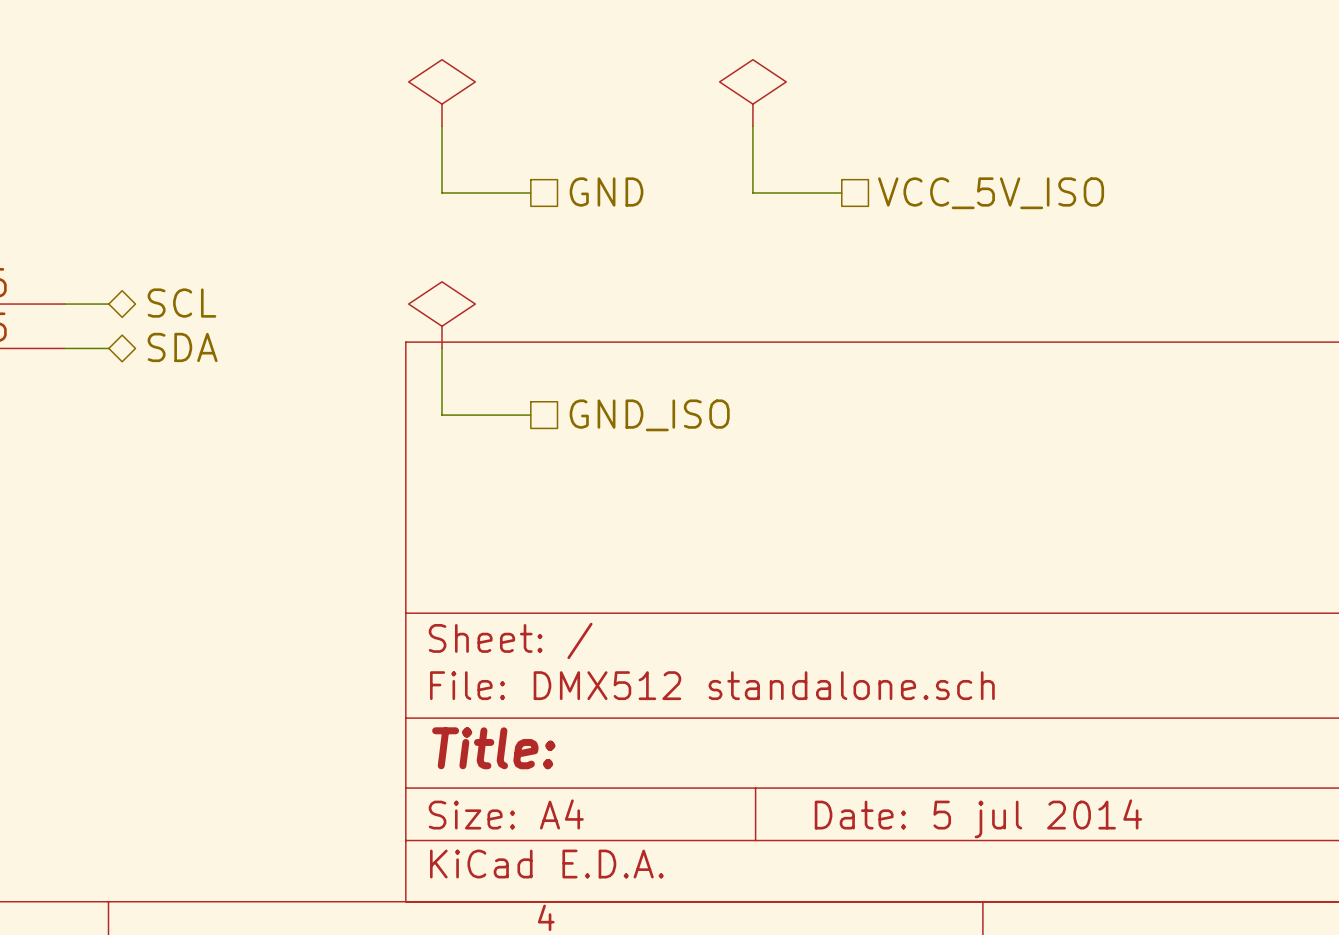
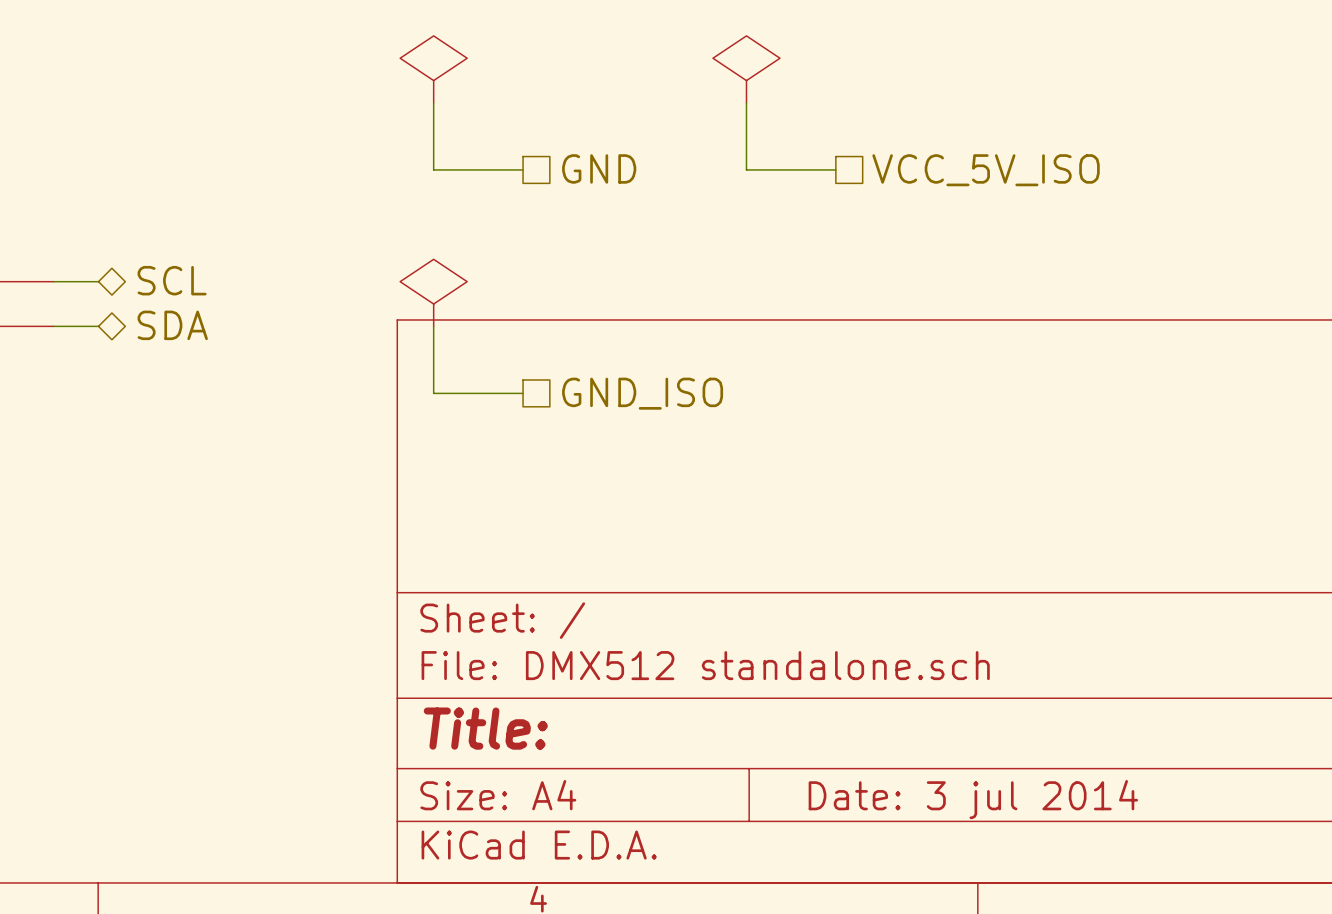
title block: Date: 5 jul 2014 (978, 818) -> Date: 3 jul 2014 (973, 799)

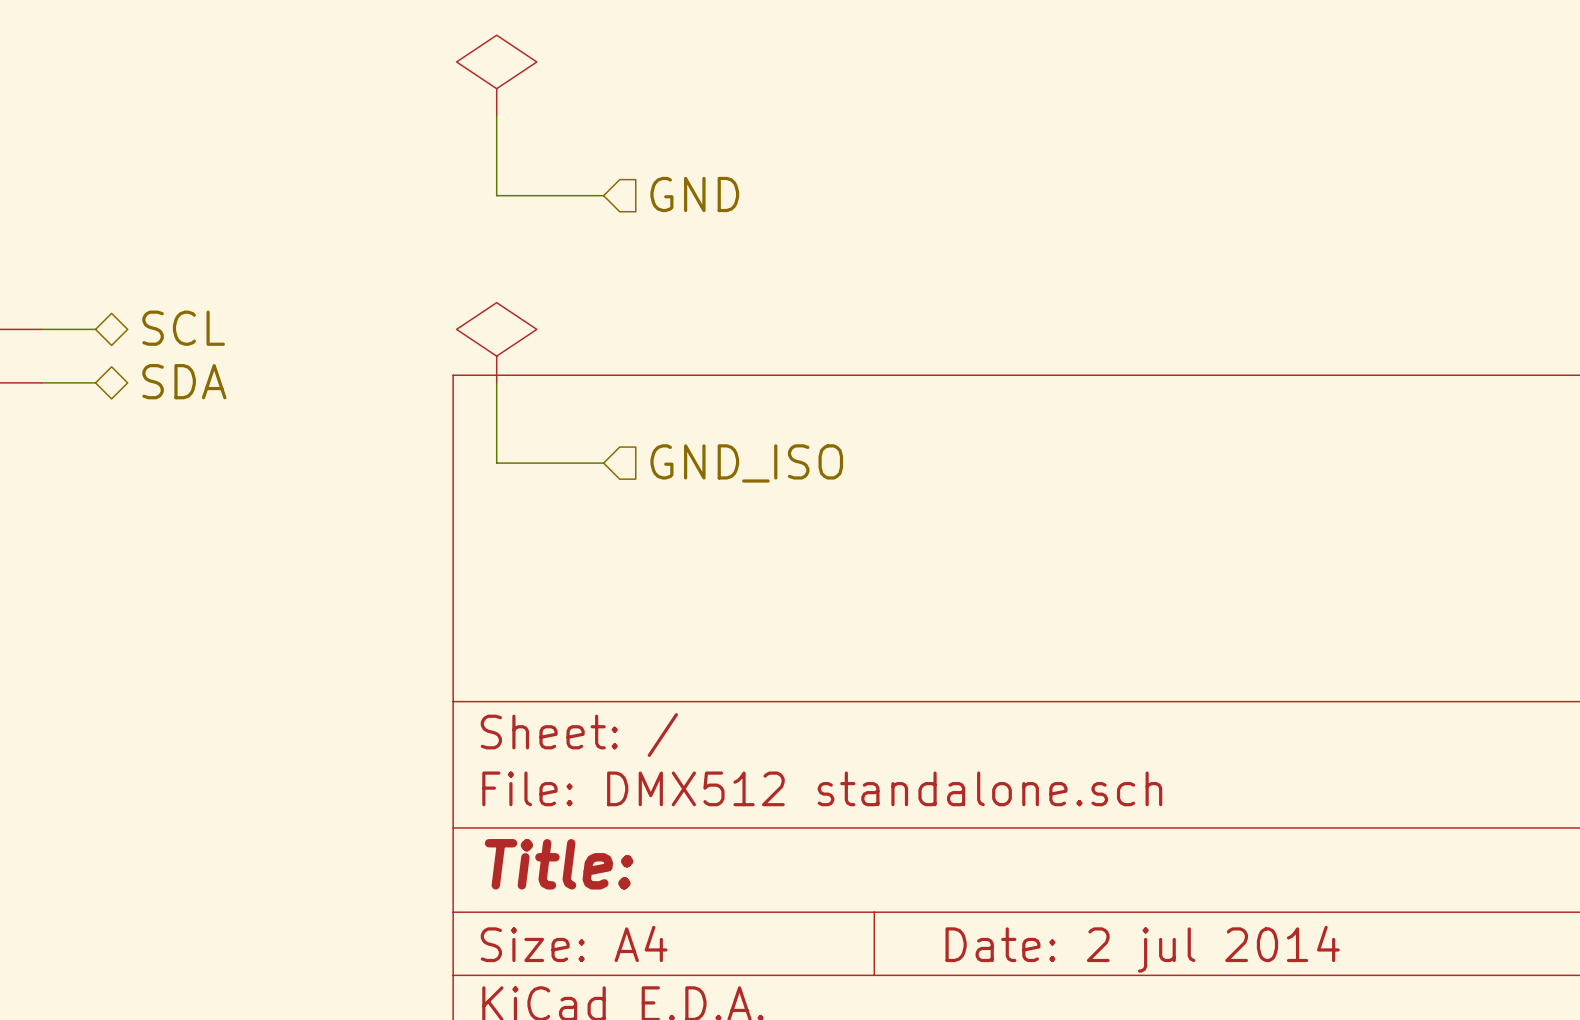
power symbol: (746, 69) -> none
wire: (746, 102) (746, 169) (835, 169) -> none
hierarchical label shape: passive (599, 168) -> input (694, 194)
hierarchical label: VCC_5V_ISO (986, 170) -> none
hierarchical label shape: passive (642, 393) -> input (746, 463)
title block: Date: 3 jul 2014 (973, 799) -> Date: 2 jul 2014 (1142, 949)

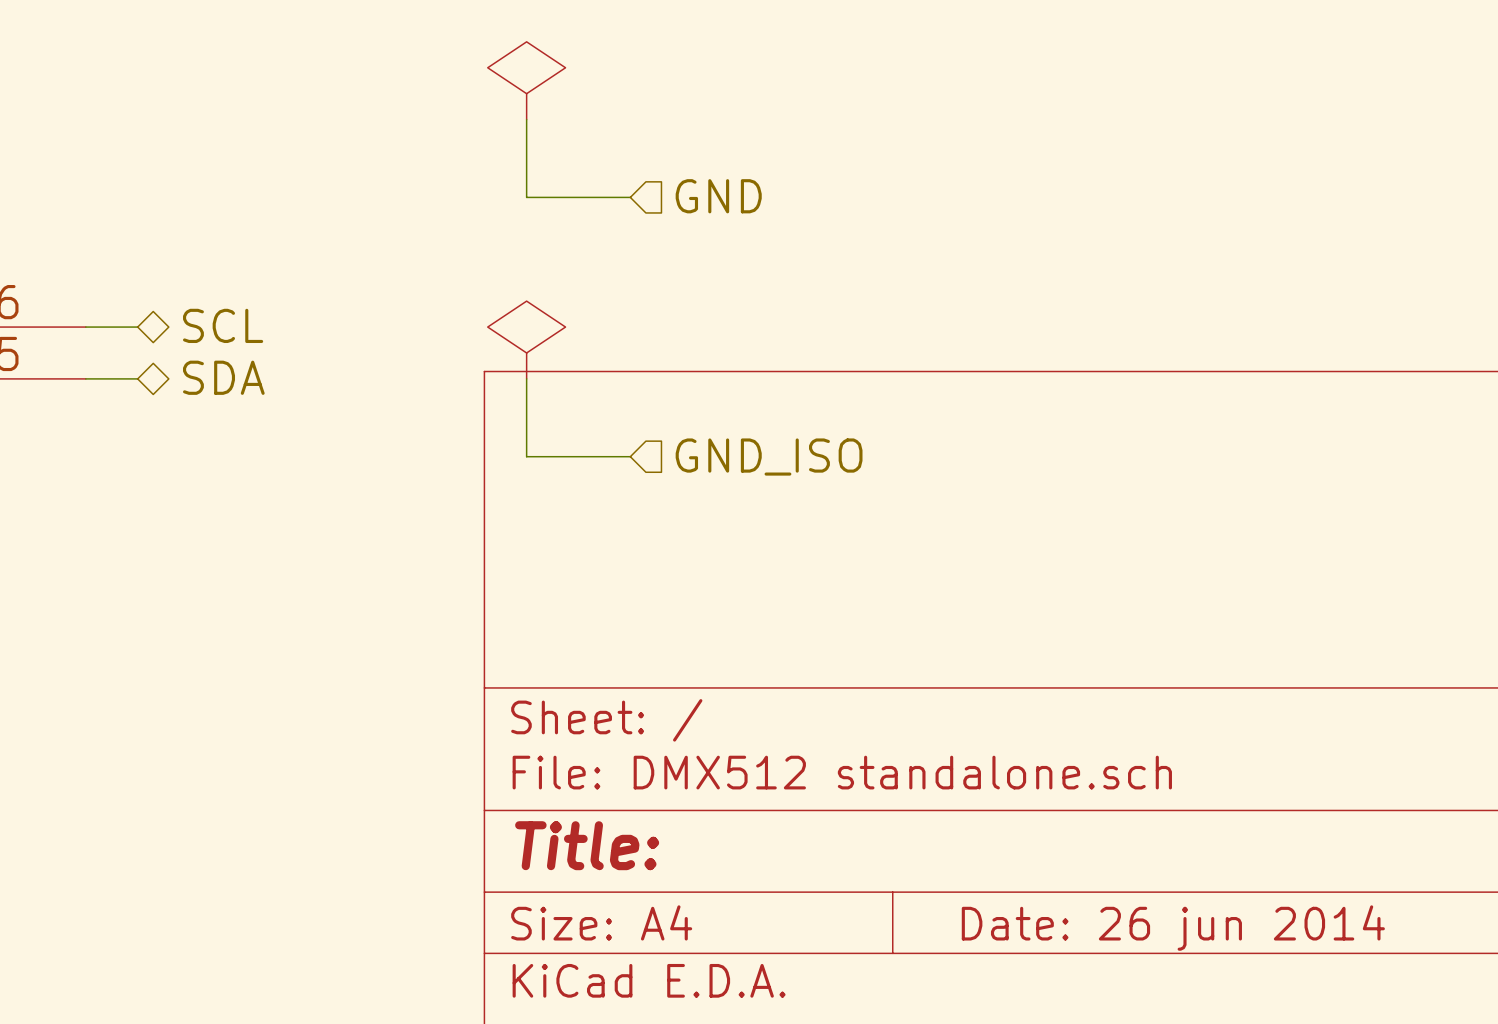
title block: Date: 2 jul 2014 (1142, 949) -> Date: 26 jun 2014 (1173, 928)

